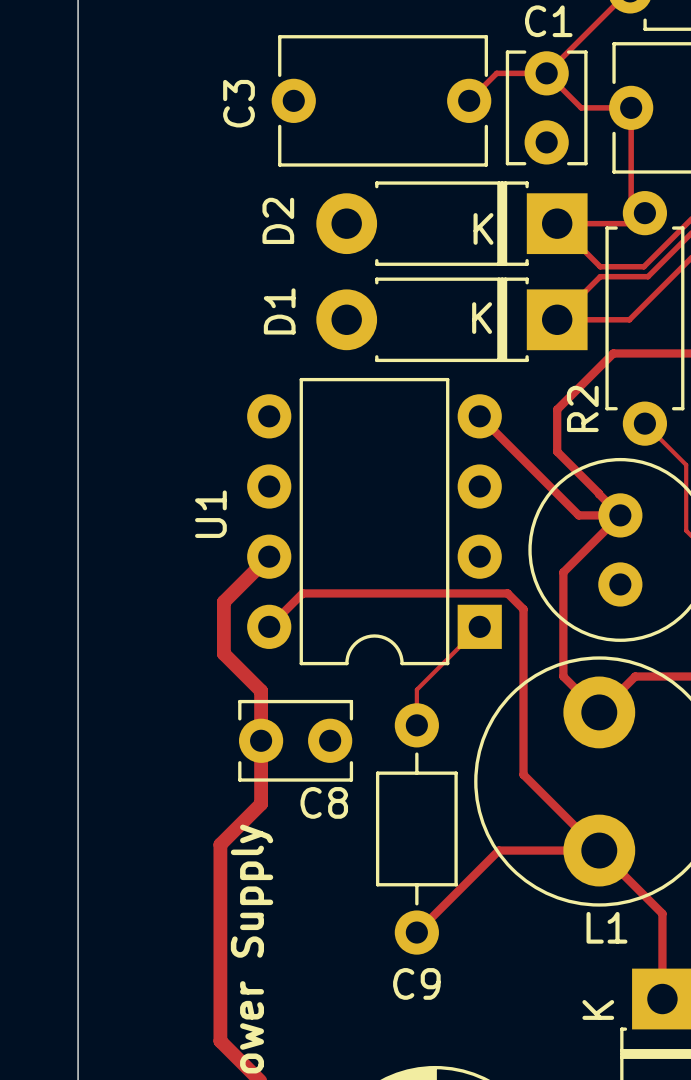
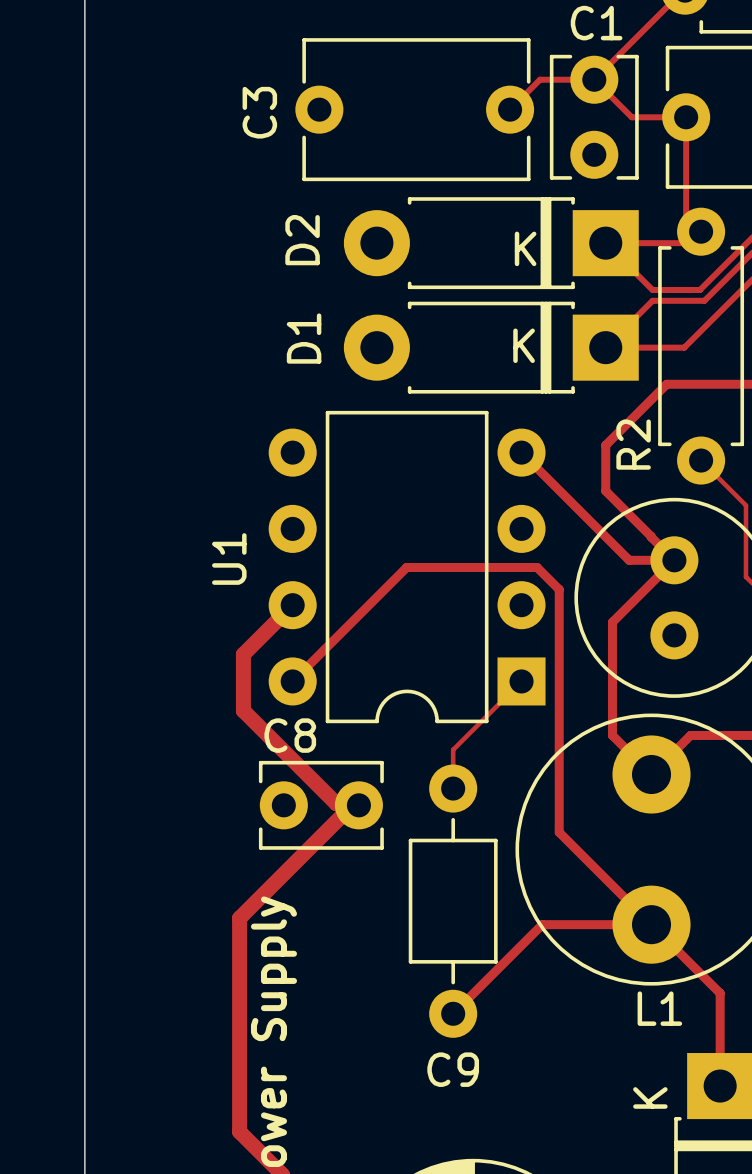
top track: (302, 593) (507, 593) (523, 609) (523, 774) -> (329, 645) (406, 567) (537, 567) (559, 589) (559, 832) (569, 842)
top track: (261, 690) (261, 803) -> (283, 751) (336, 803) (354, 803) (283, 873)
C8 name position: C8 (324, 802) -> C8 (290, 735)

